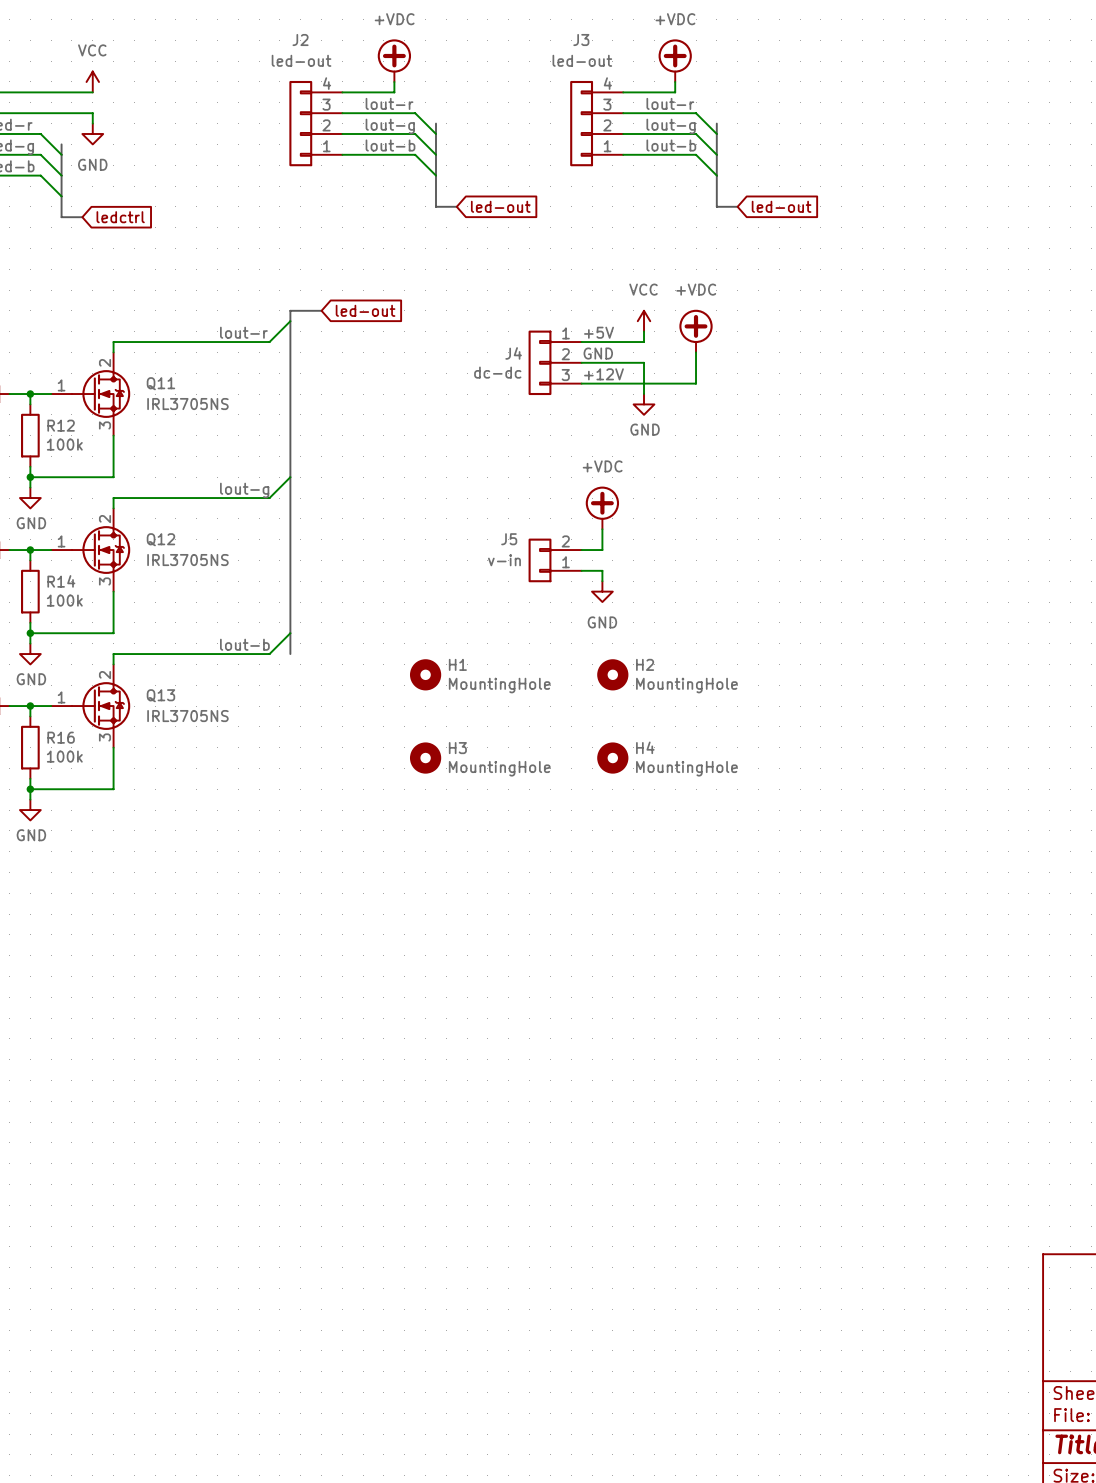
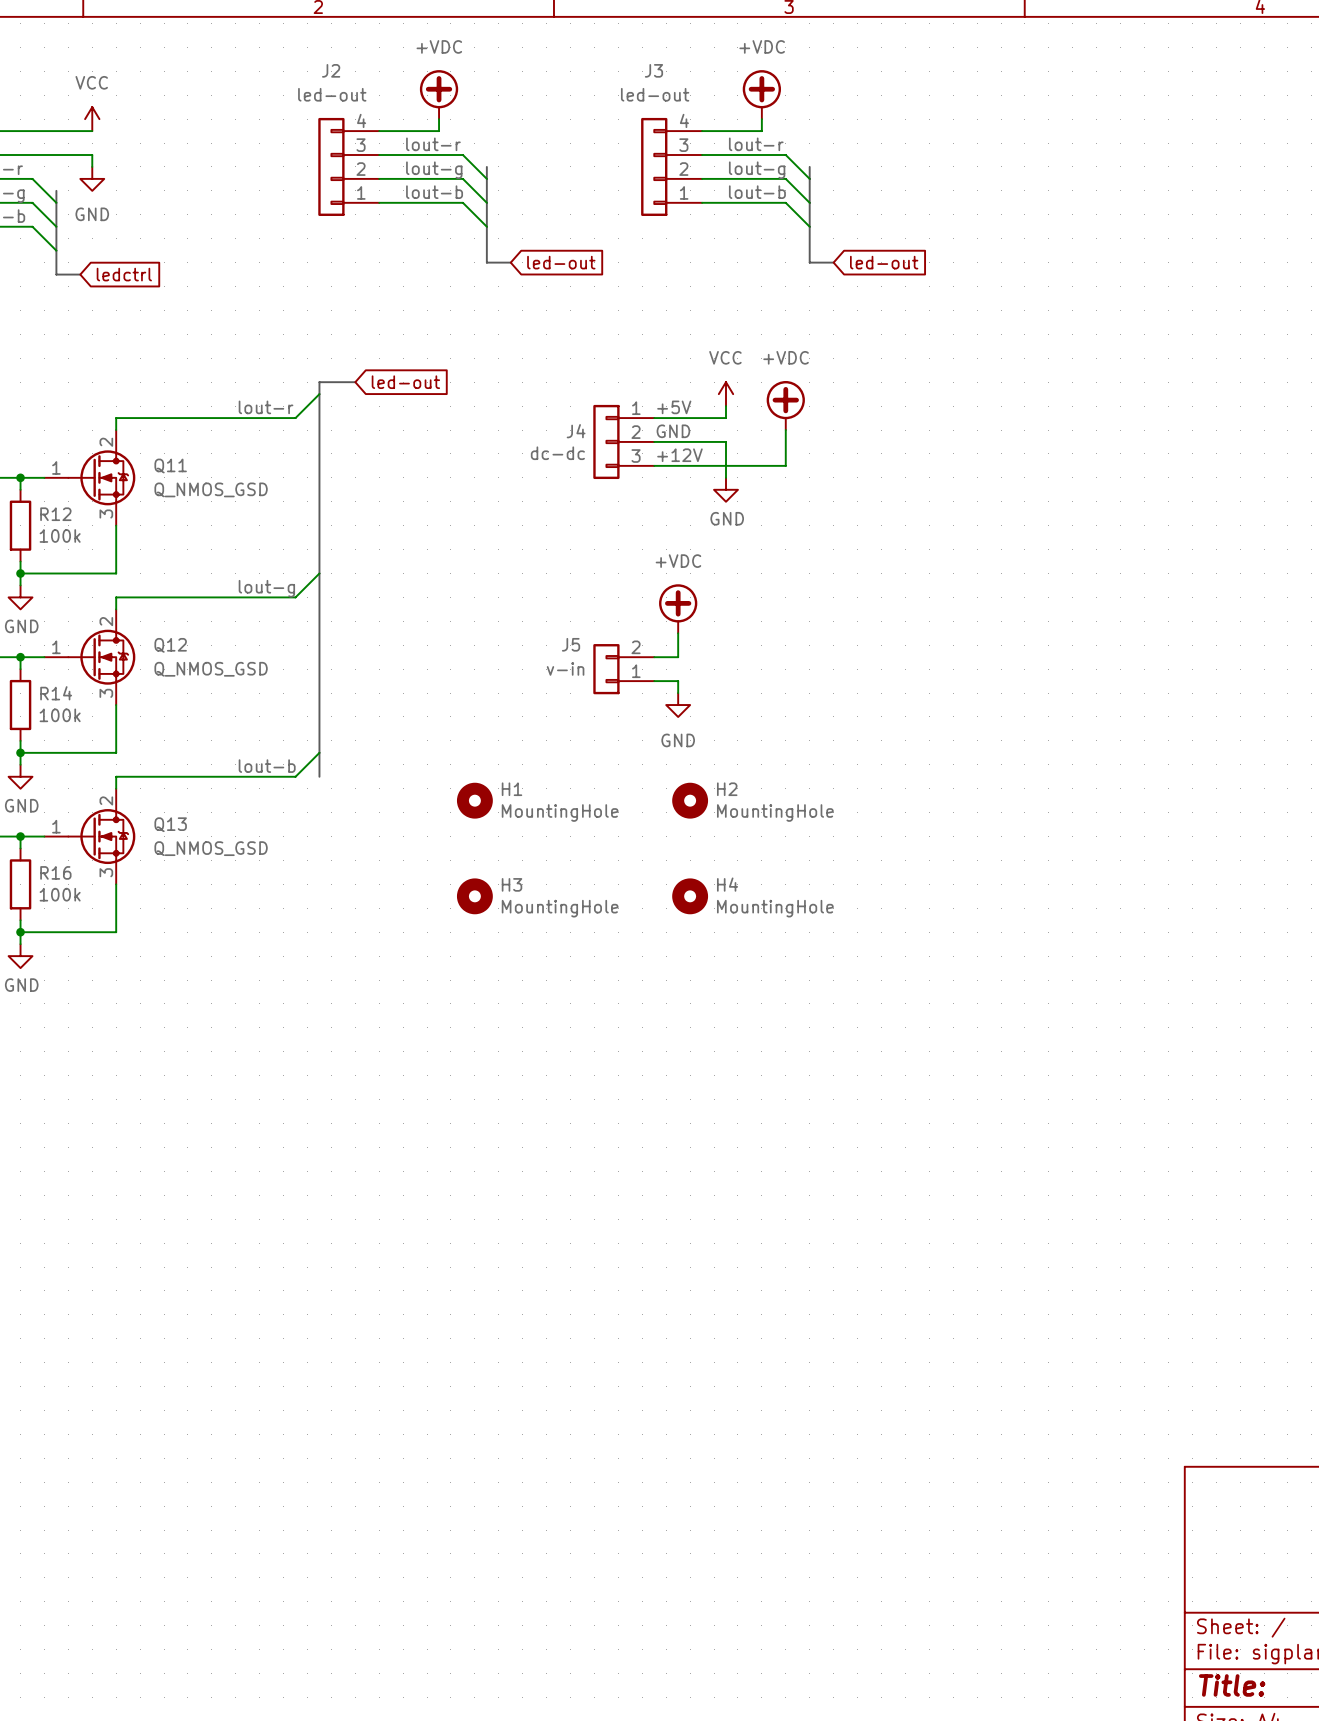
Q11 value: IRL3705NS (187, 404) -> Q_NMOS_GSD (211, 489)
Q12 value: IRL3705NS (187, 560) -> Q_NMOS_GSD (211, 669)
Q13 value: IRL3705NS (187, 716) -> Q_NMOS_GSD (211, 848)

